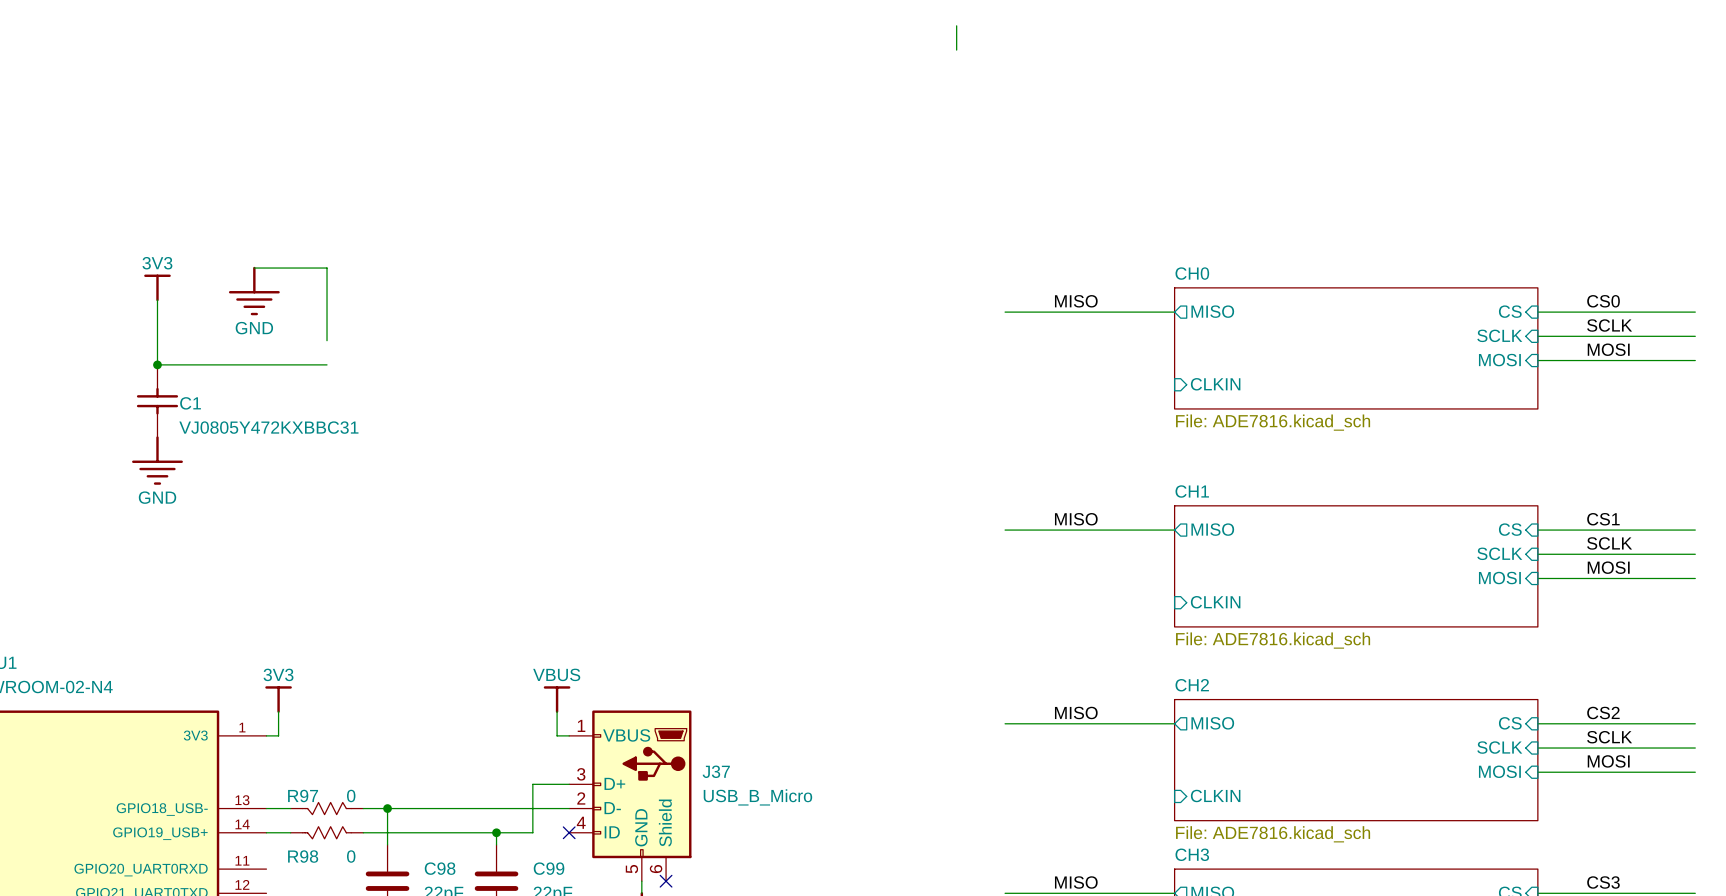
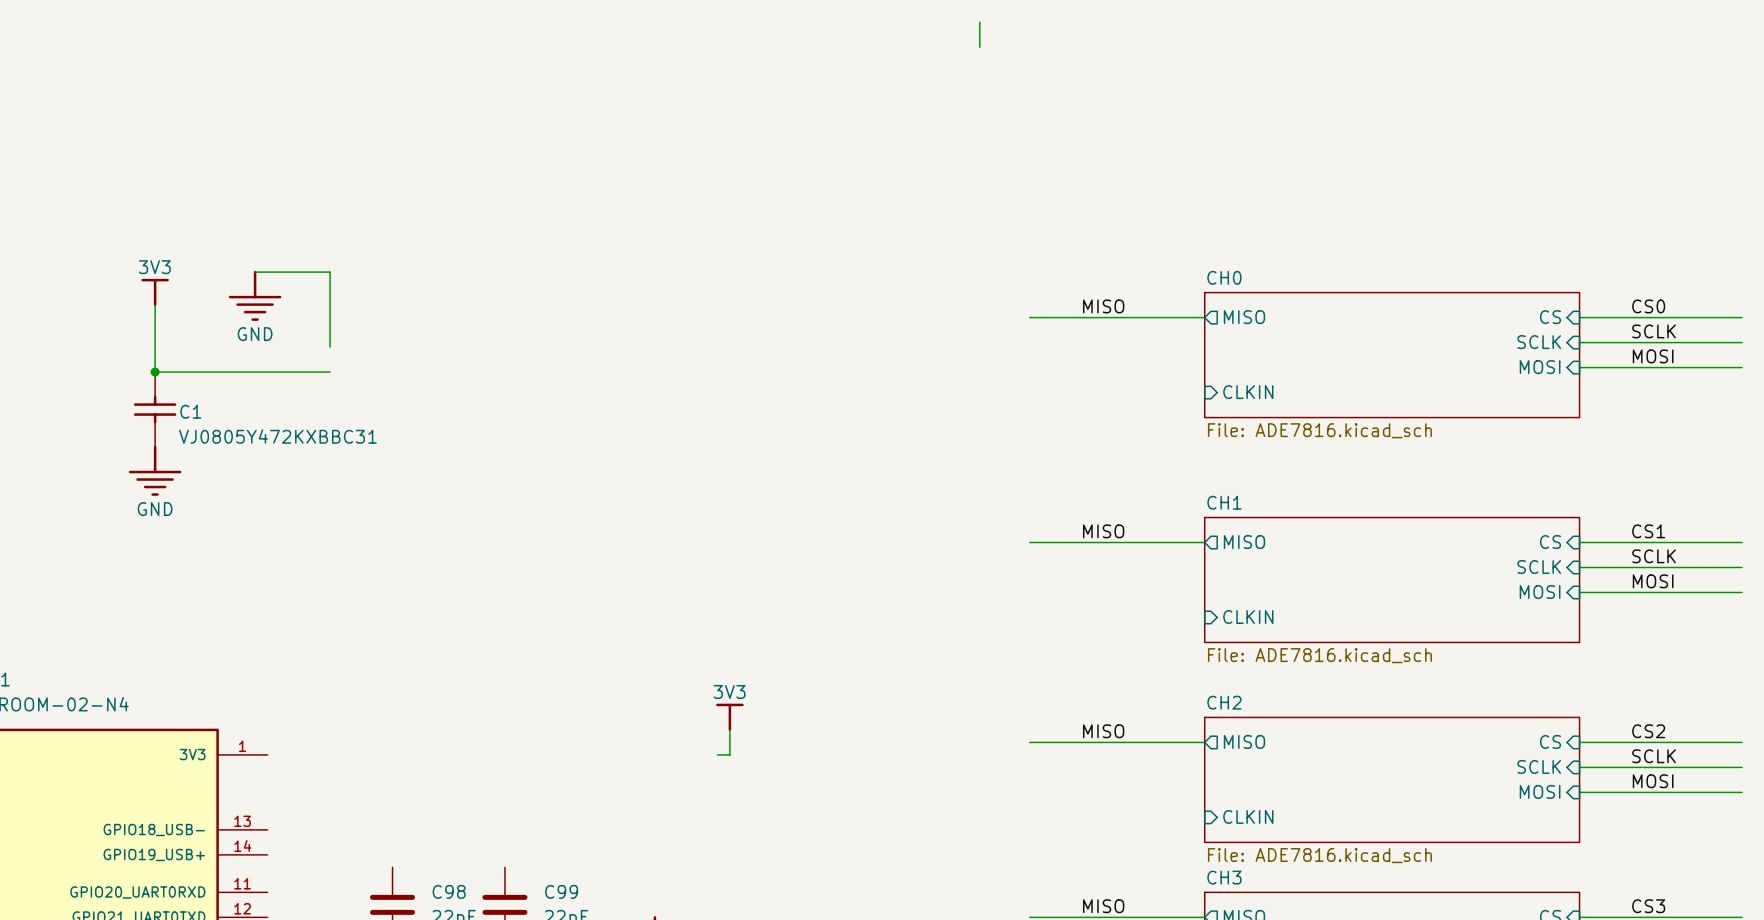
power symbol: 3V3 (278, 699) -> none
power symbol: VBUS (557, 699) -> none
power symbol: none -> 3V3 (729, 717)
wire: (278, 711) (278, 735) (266, 735) -> none
wire: (557, 711) (557, 735) (569, 735) -> none
wire: none -> (729, 729) (729, 754) (717, 754)
wire: (569, 784) (532, 784) (532, 832) (363, 832) -> none
J37: USB_B_Micro (630, 795) -> none
wire: (266, 808) (290, 808) -> none
R97: 0 (327, 808) -> none
wire: (363, 808) (569, 808) -> none
wire: (387, 808) (387, 844) -> none
junction: (387, 808) -> none
wire: (266, 832) (290, 832) -> none
R98: 0 (327, 832) -> none
wire: (496, 832) (496, 844) -> none
junction: (496, 832) -> none
no-connect mark: (569, 832) -> none
wire: (641, 881) (641, 893) -> none
no-connect mark: (666, 881) -> none

